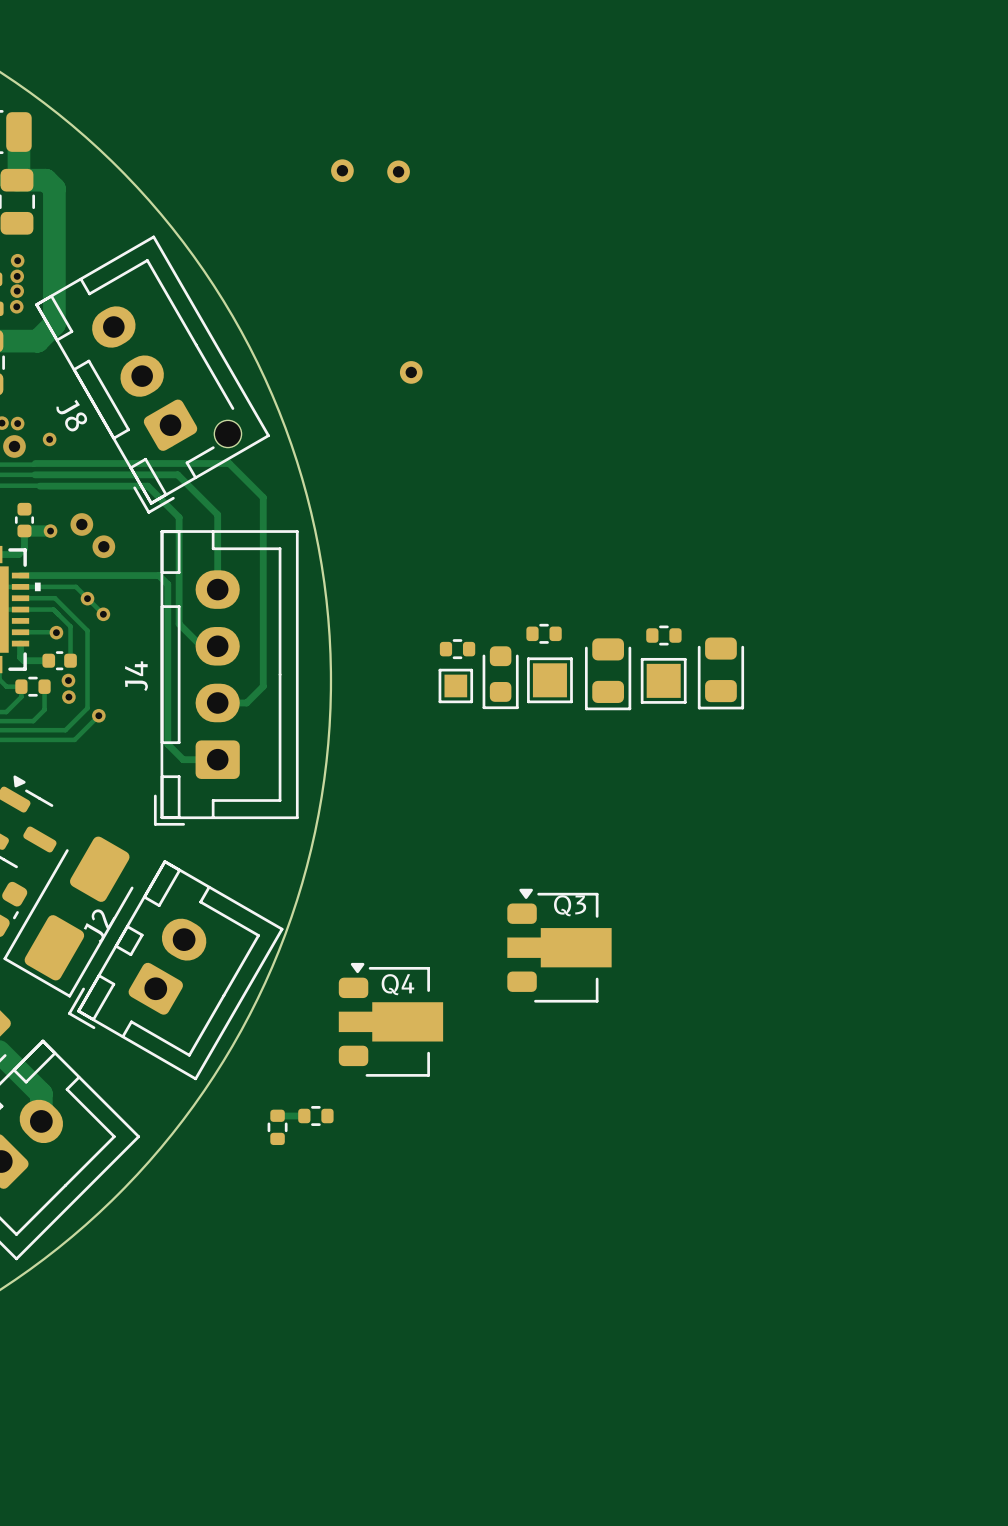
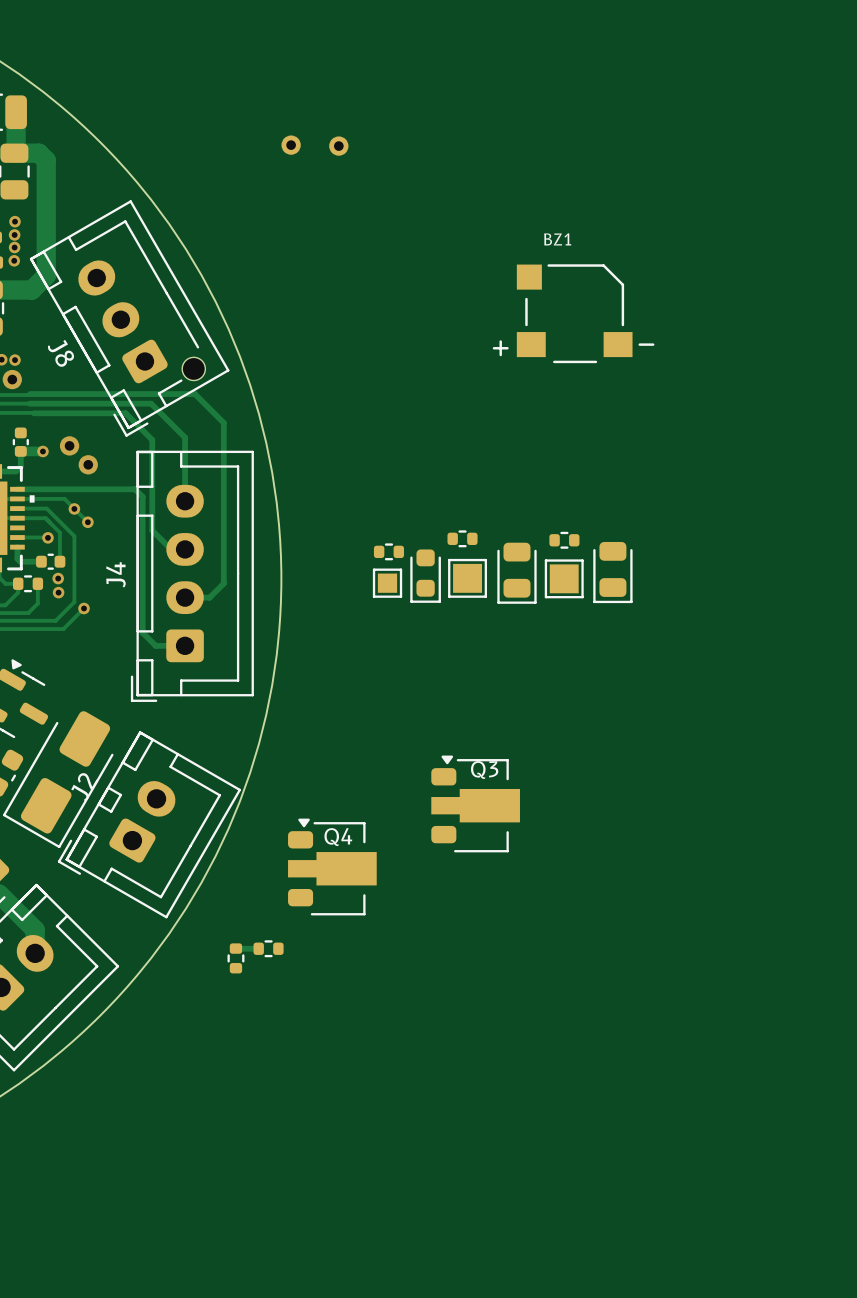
BZ1: none -> (573, 313)
part: (411, 372) -> none
via: (49, 439) -> none

